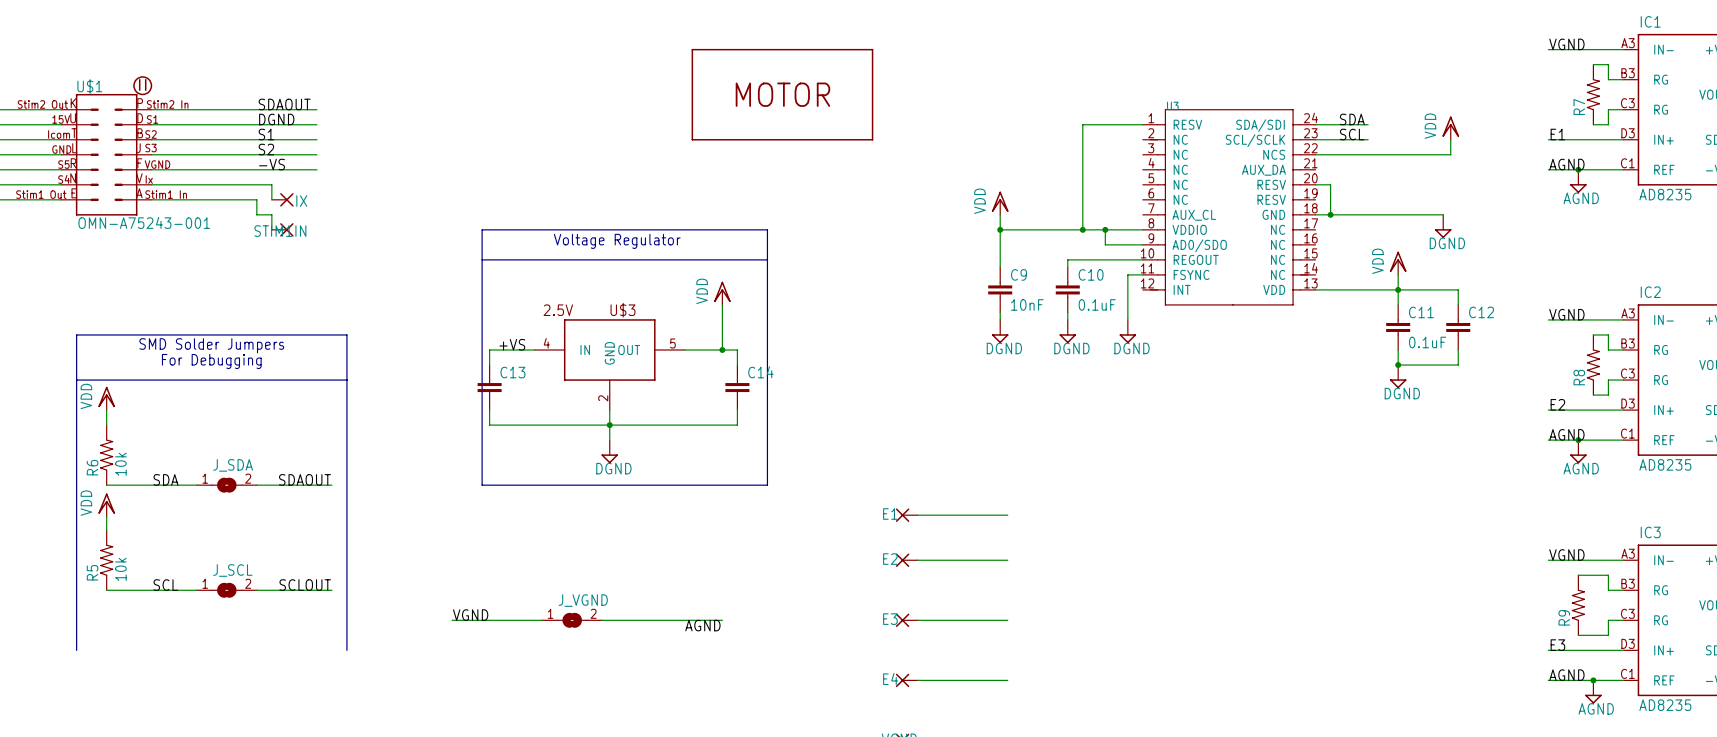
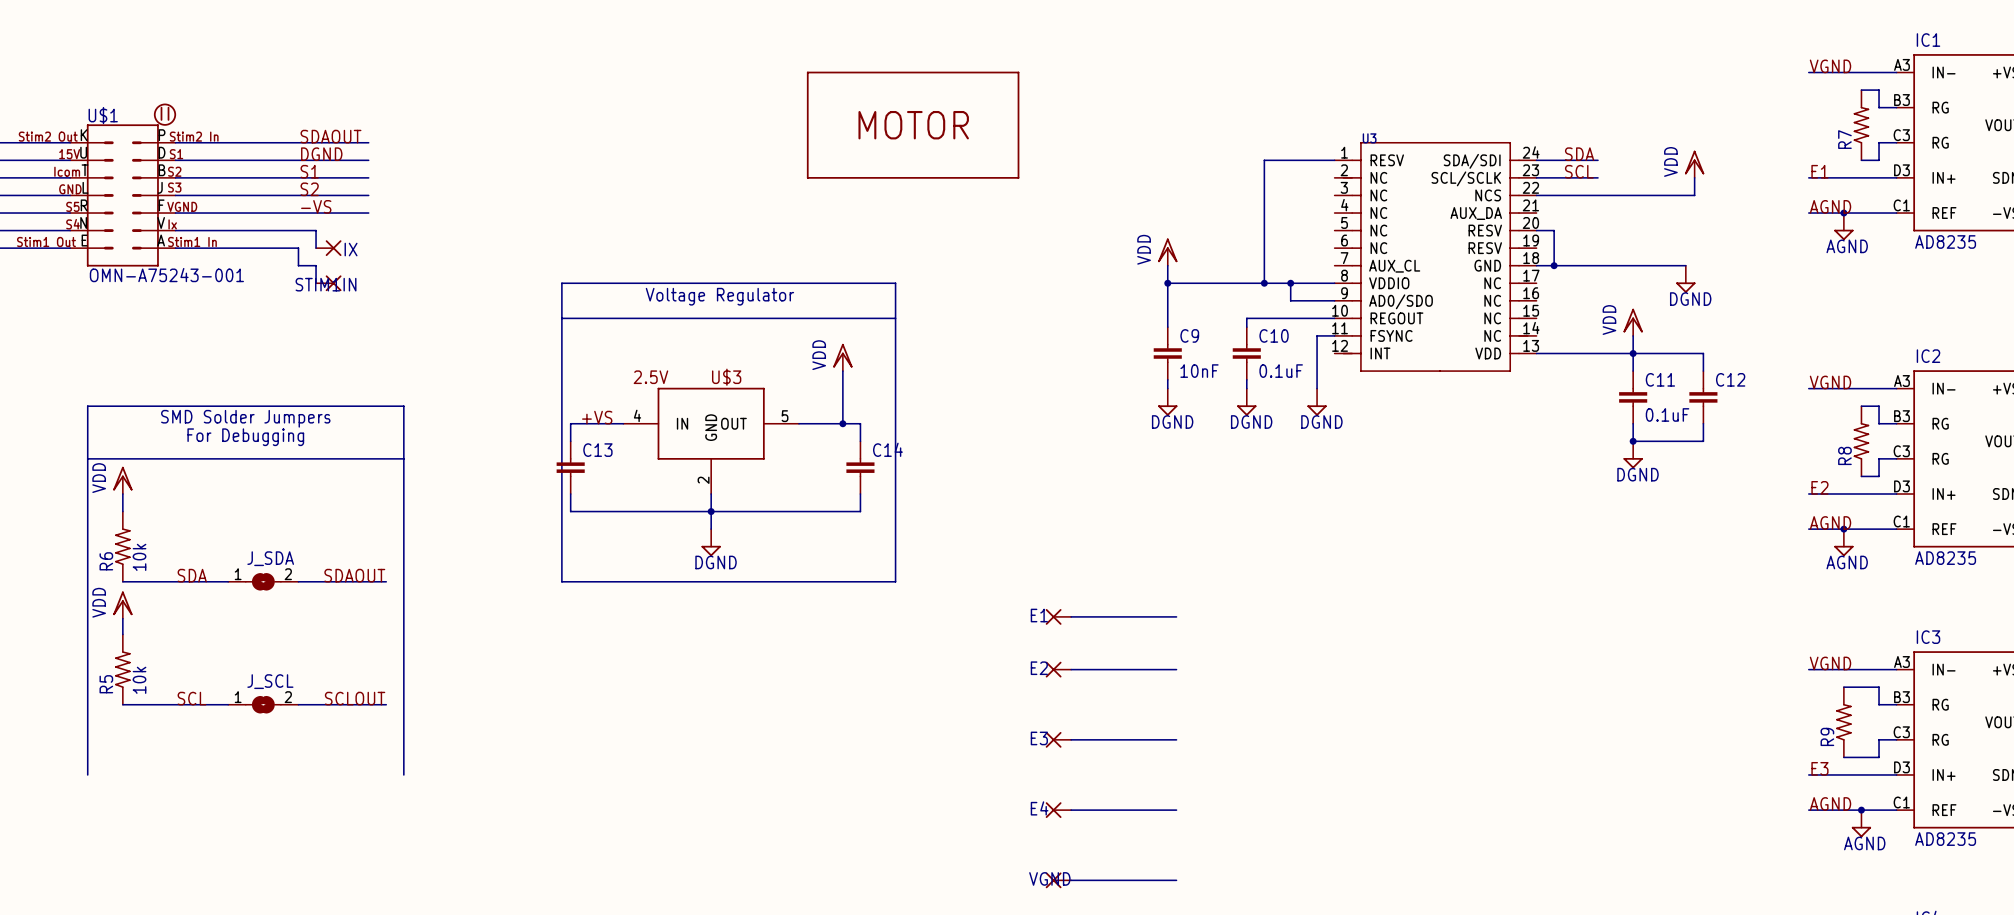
label: VGND (470, 615) -> none
wire: (452, 620) (542, 620) -> none
J_VGND: (572, 620) -> none
wire: (602, 620) (722, 620) -> none
label: AGND (702, 625) -> none

